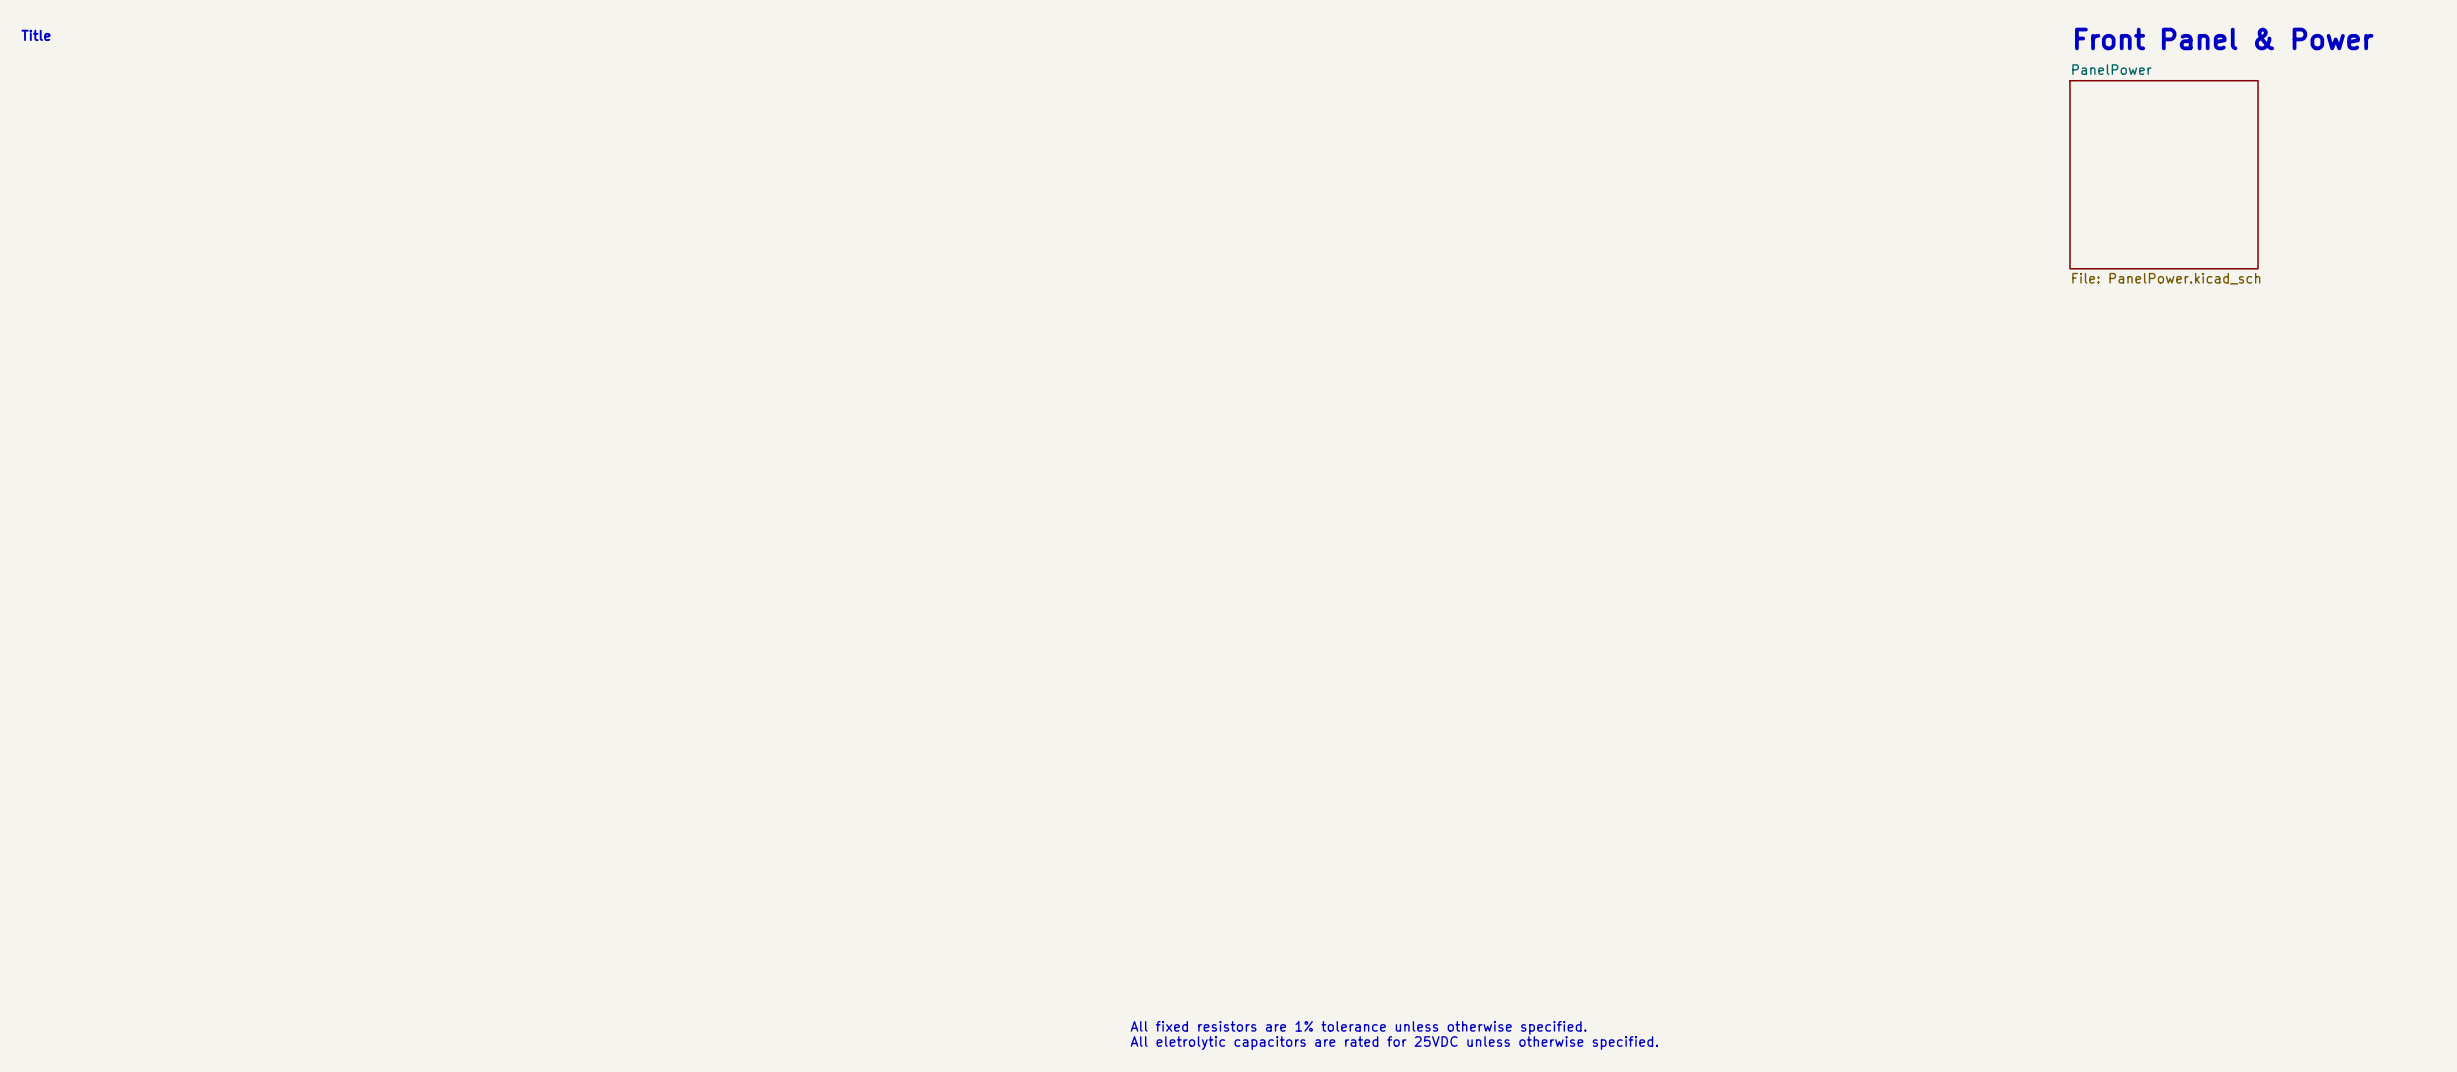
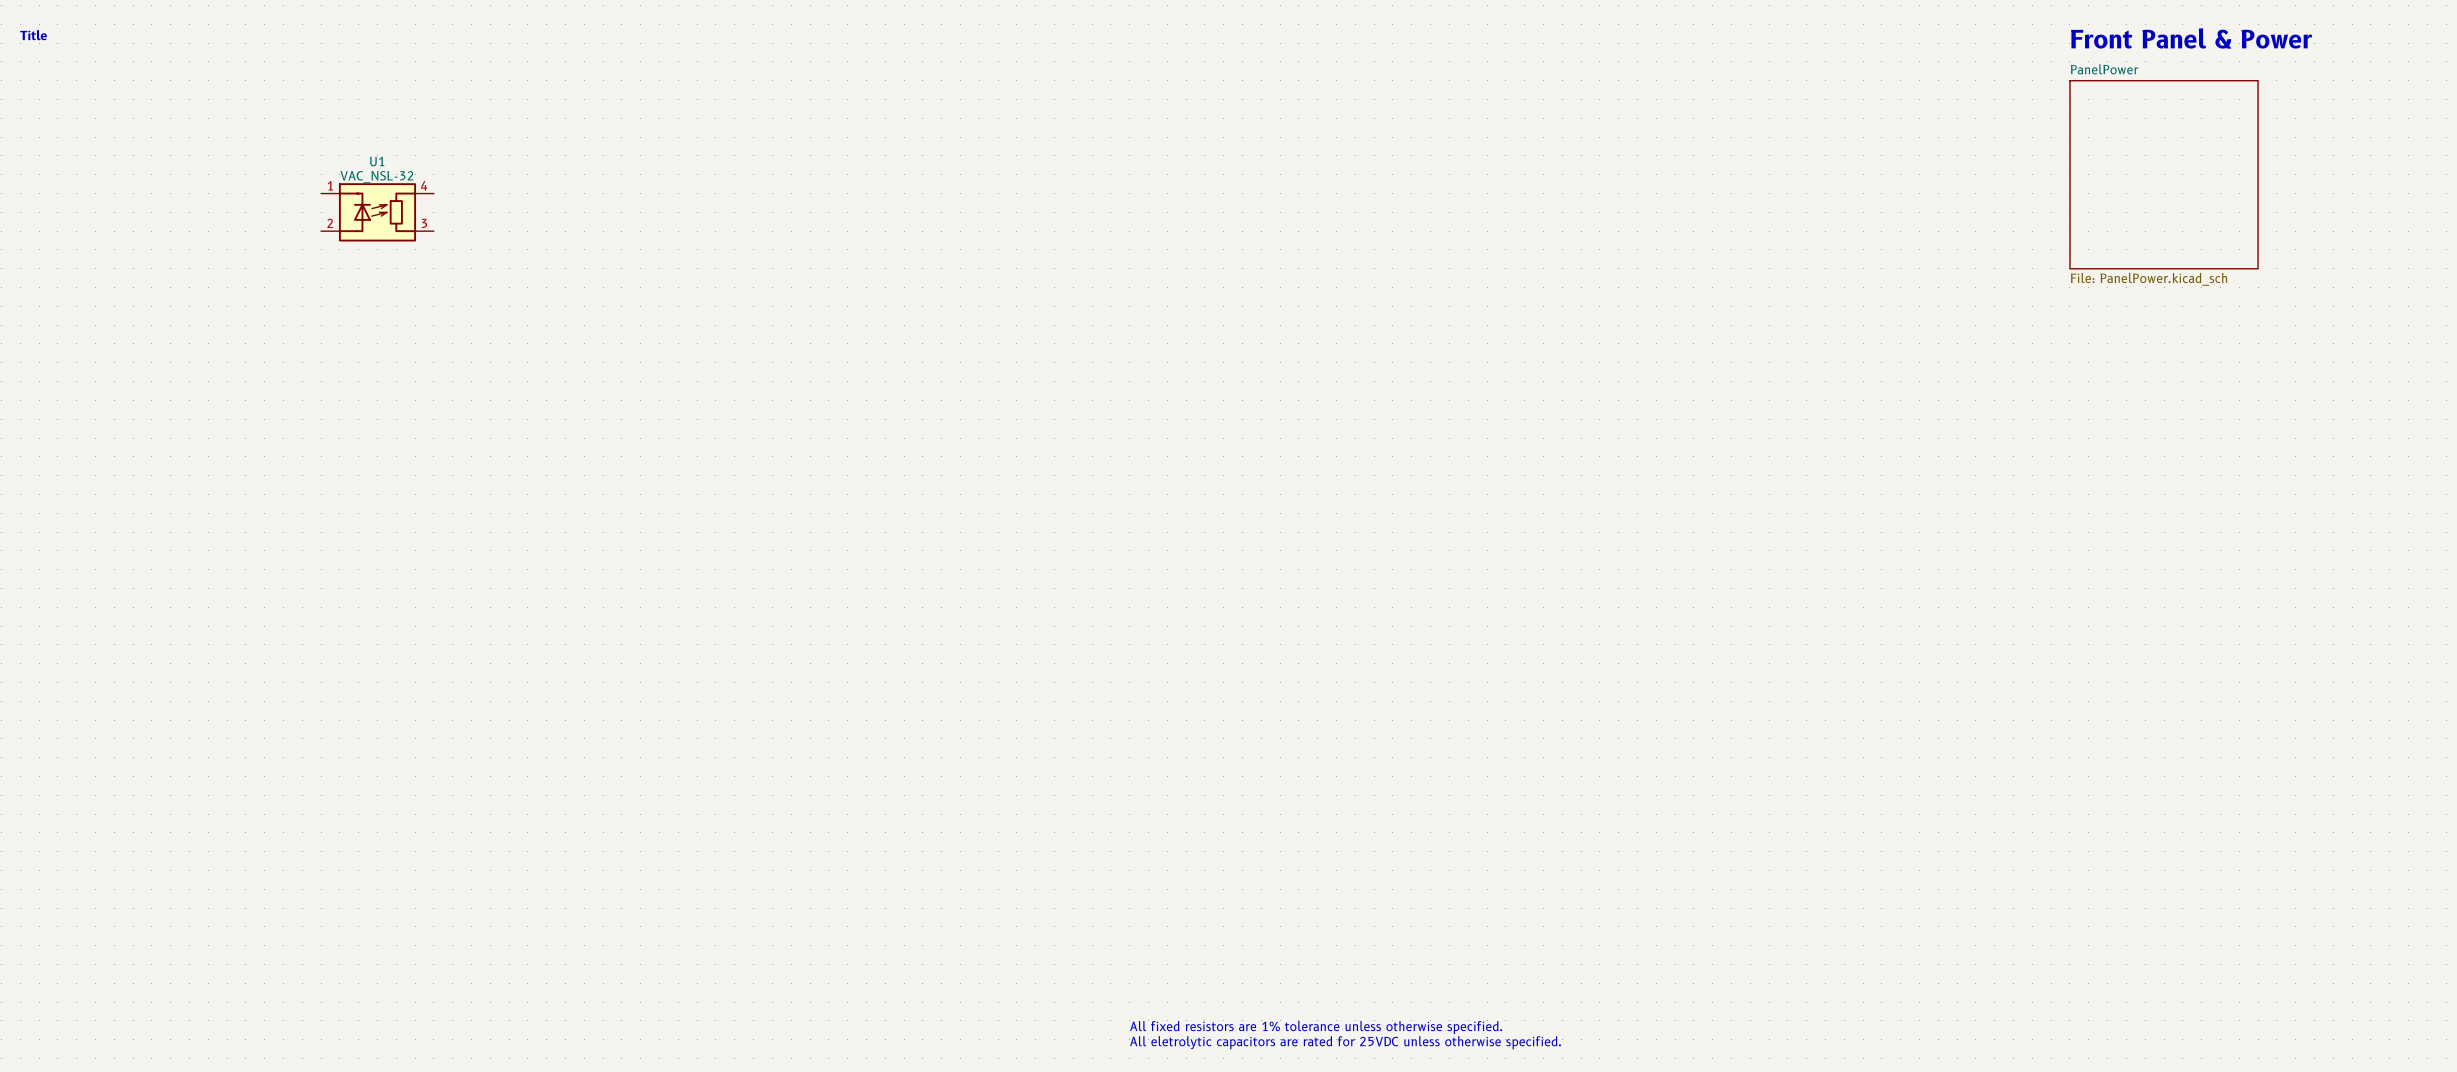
U1: none -> VAC_NSL-32 (377, 212)

